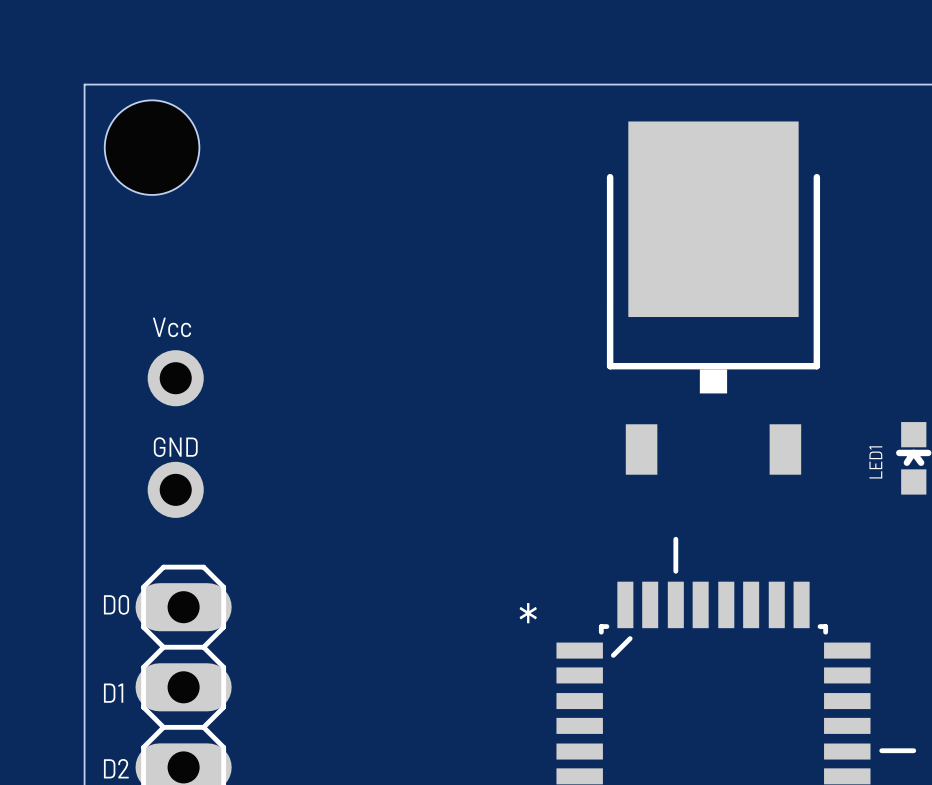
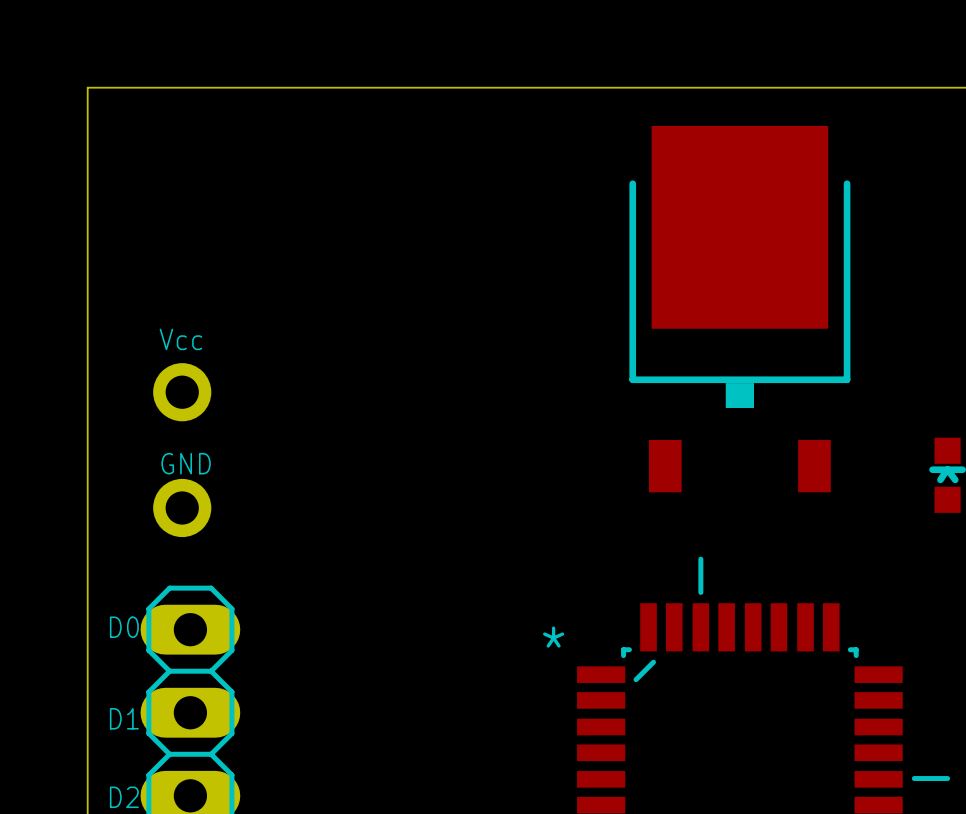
hole: (152, 147) -> none
LED1 name: LED1 (875, 462) -> none

